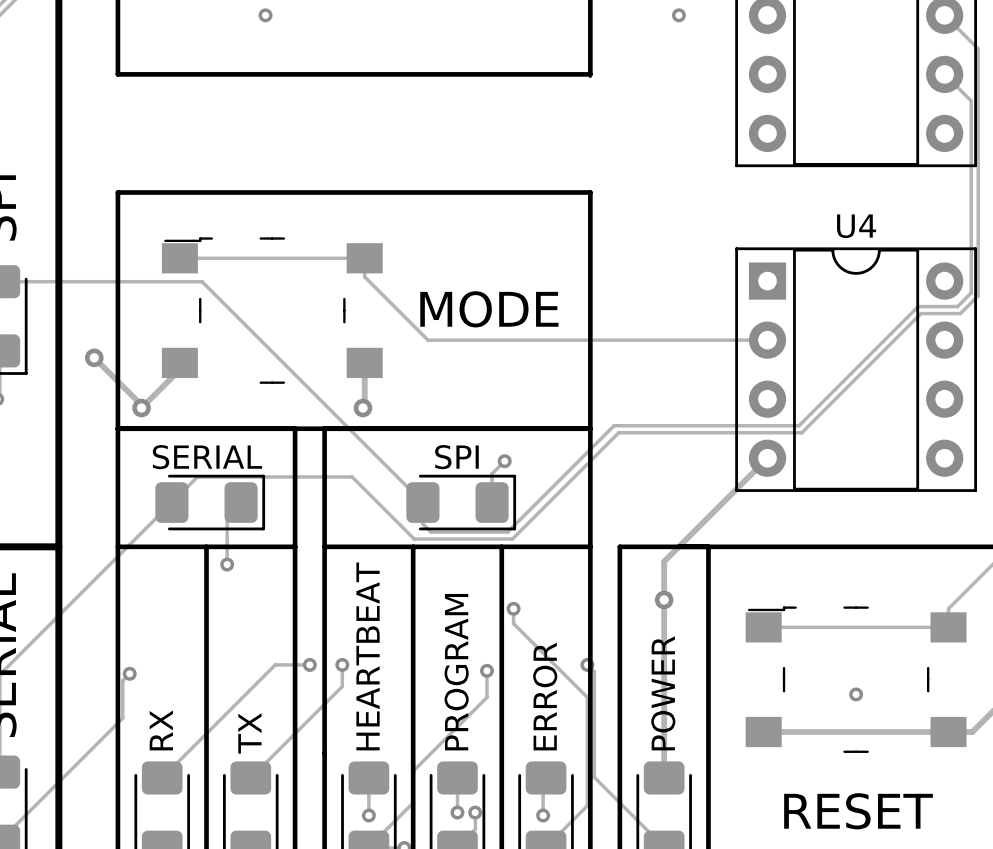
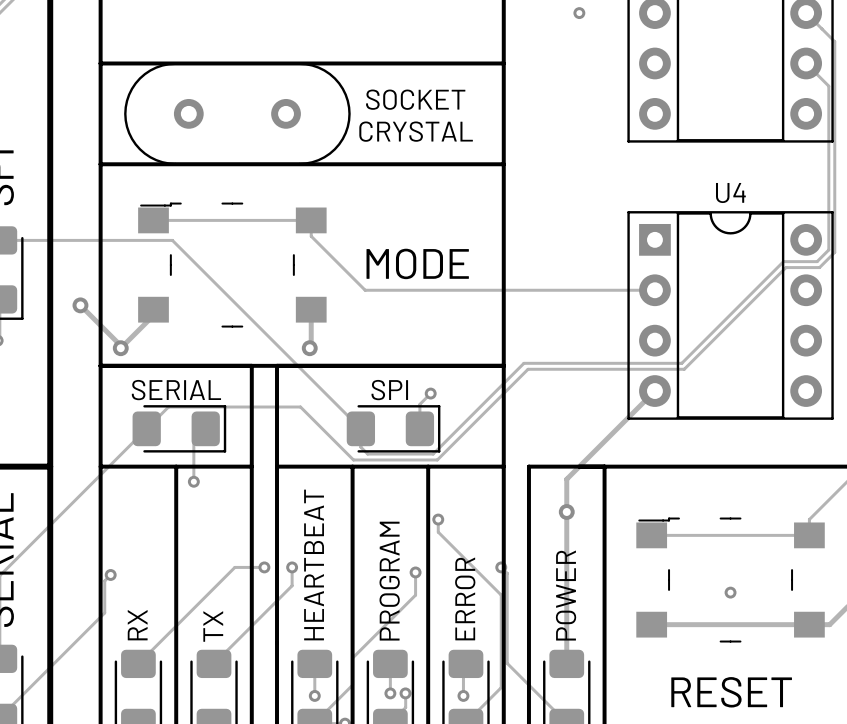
via: (265, 15) -> none
line: none -> (100, 63) (100, 164)
line: none -> (503, 63) (503, 164)
text: none -> SOCKET (415, 99)
part: none -> (237, 113)
text: none -> CRYSTAL (416, 131)

